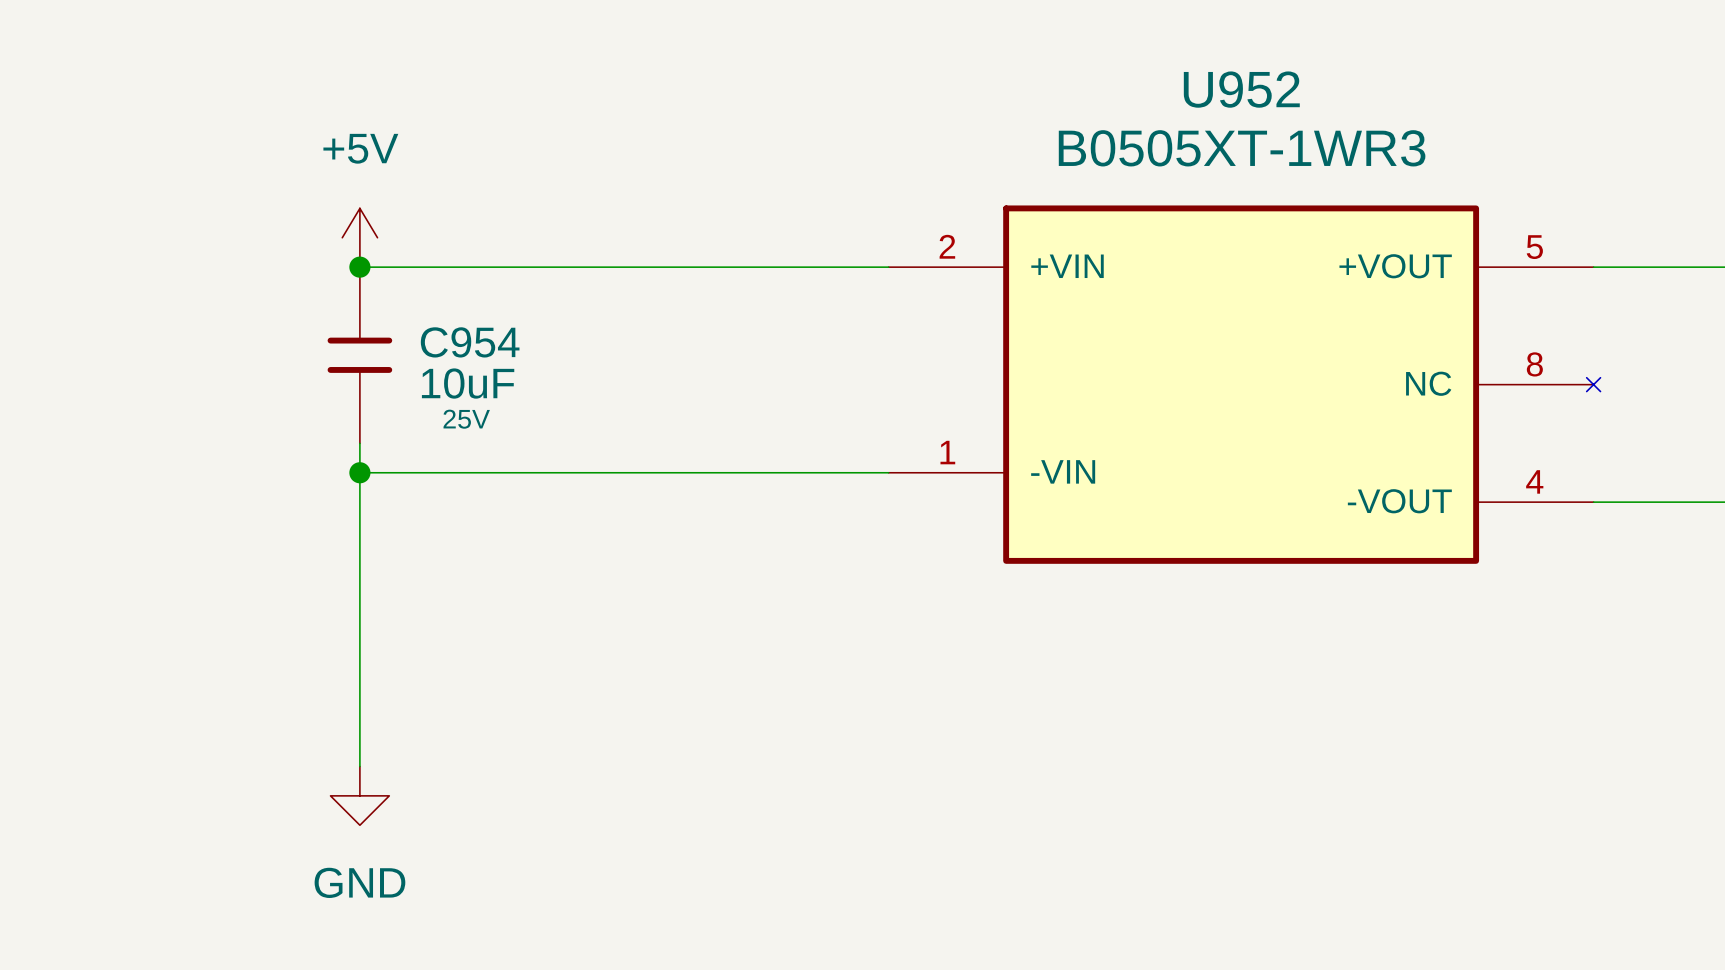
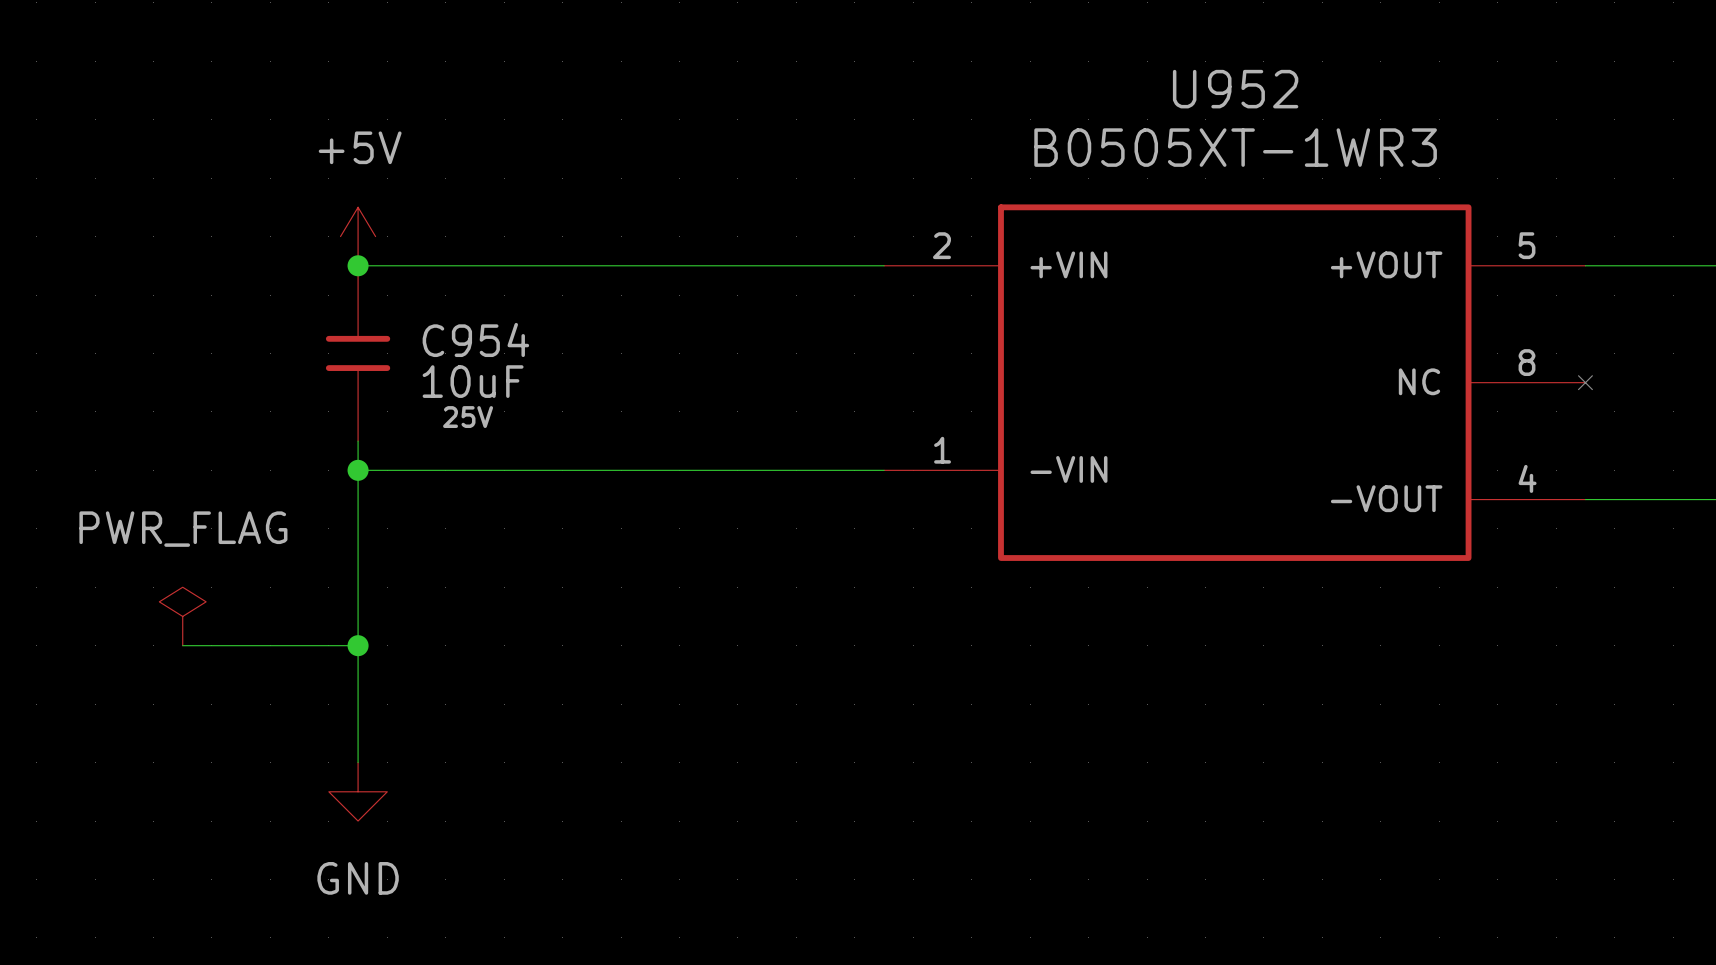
power symbol: none -> PWR_FLAG (182, 616)
wire: none -> (182, 645) (358, 645)
junction: none -> (358, 645)

